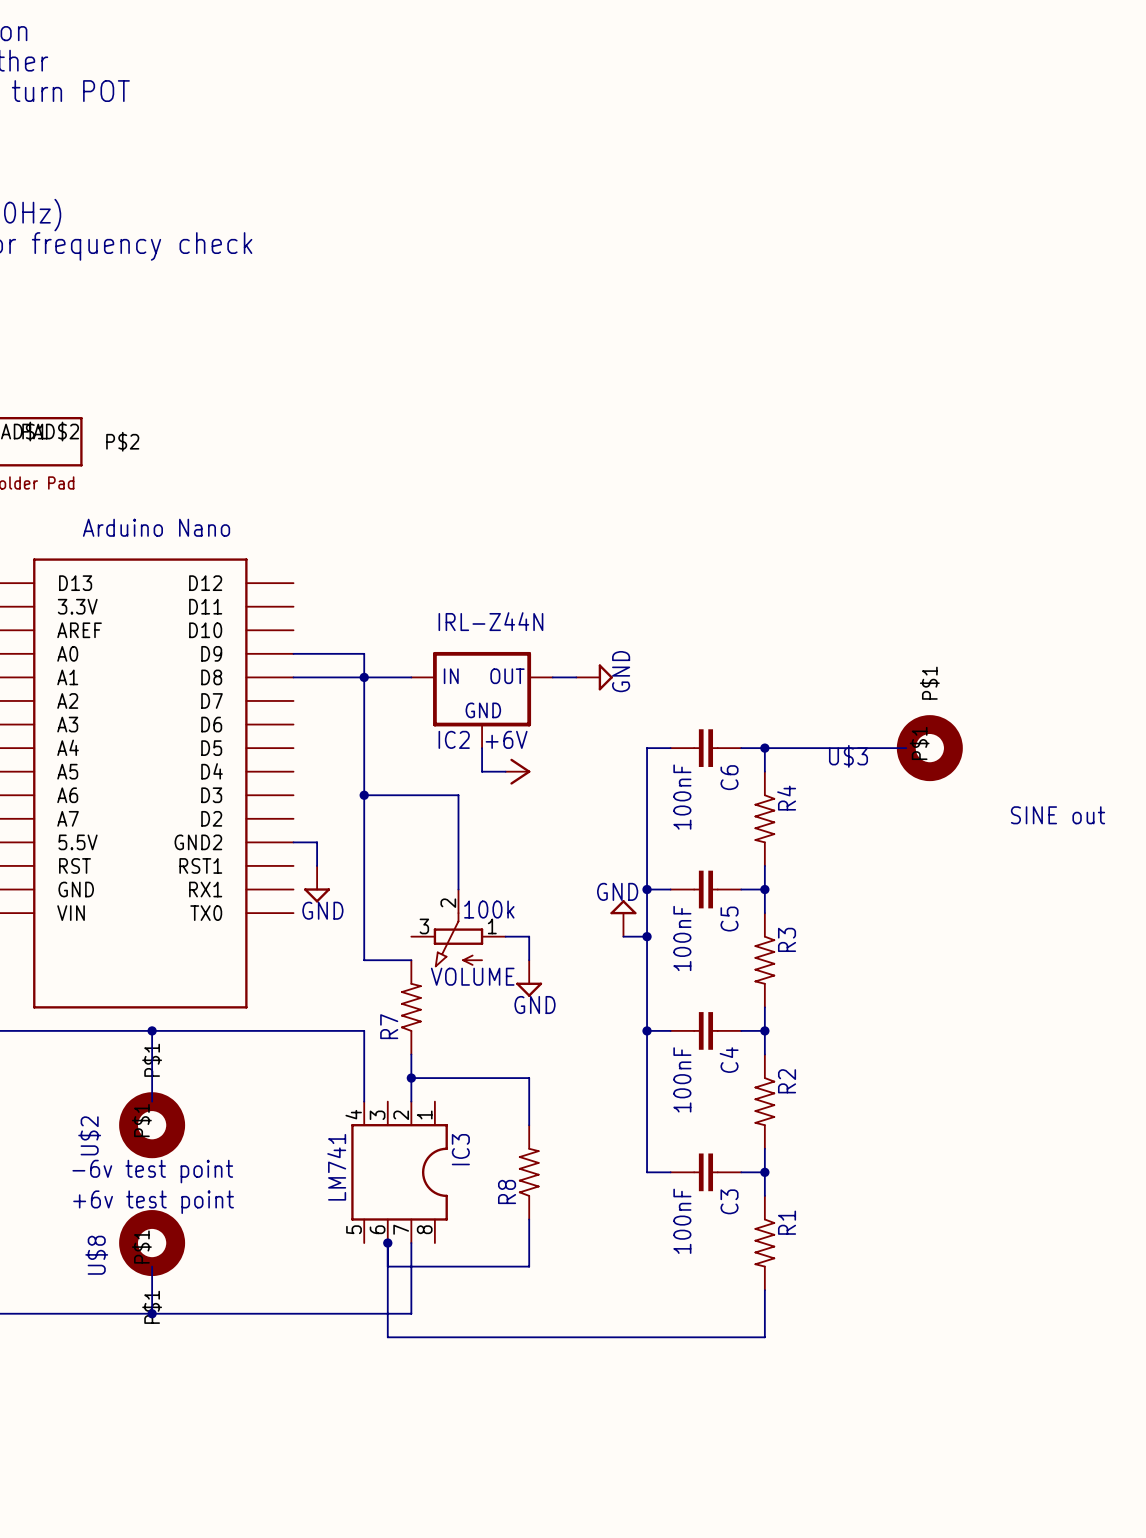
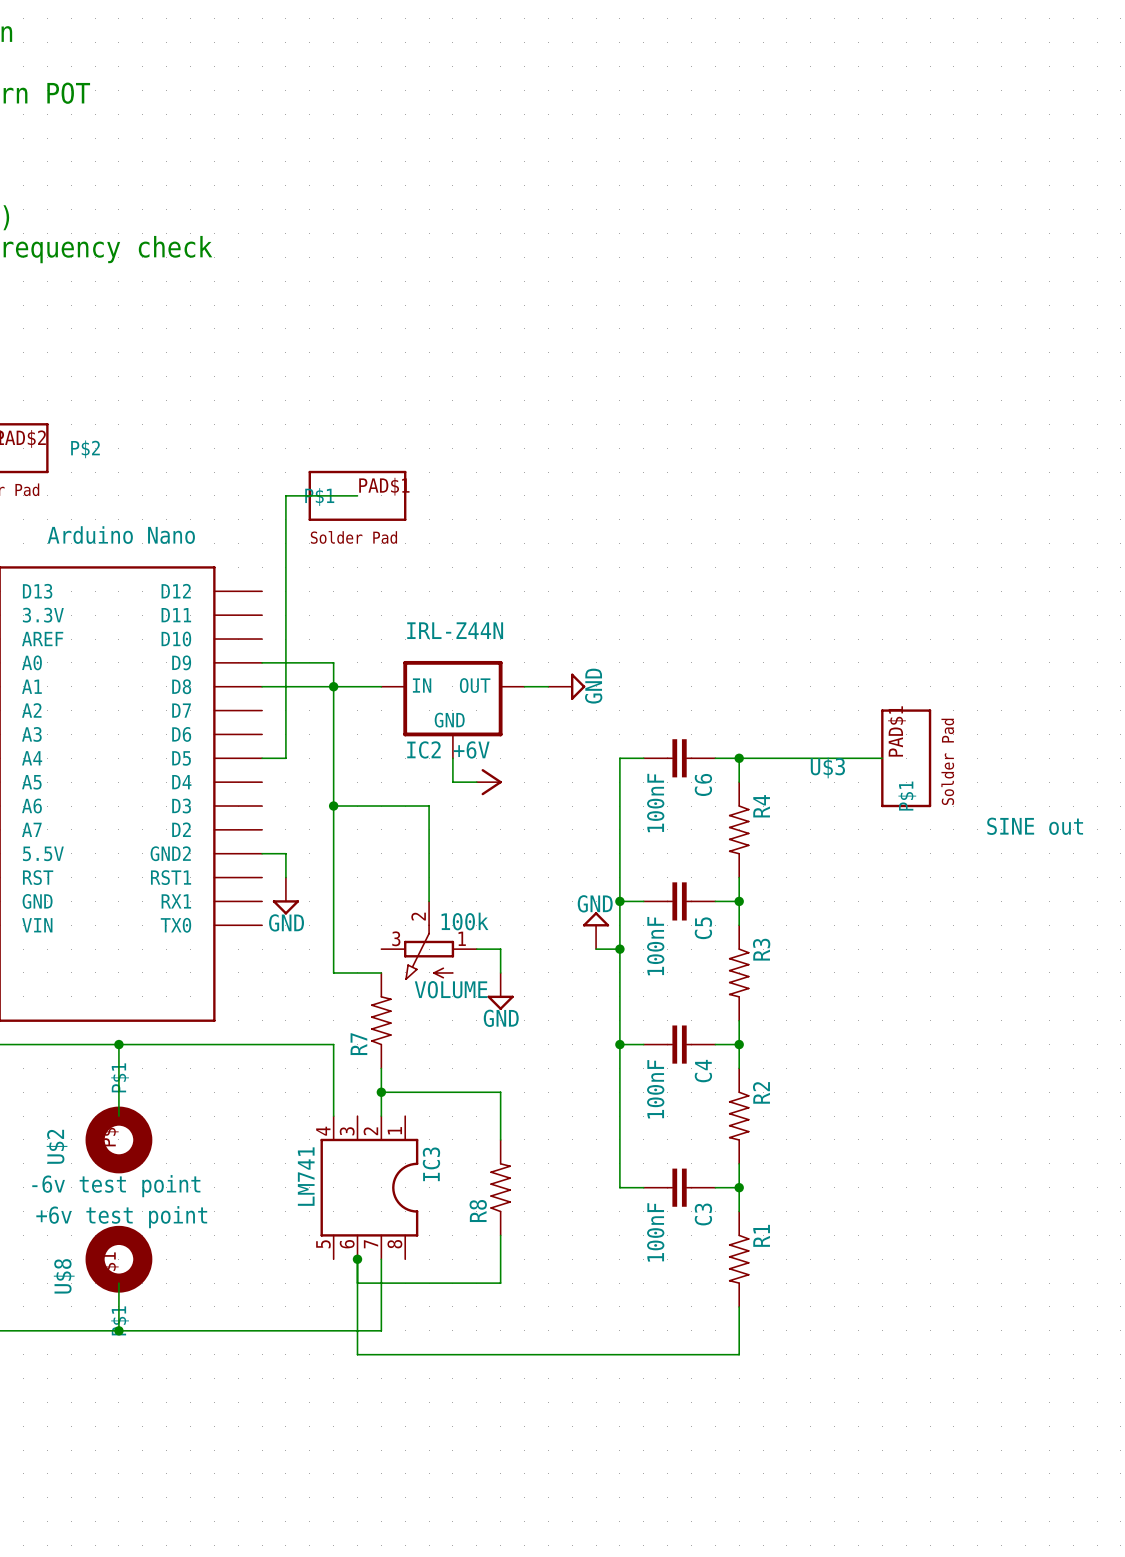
wire: none -> (357, 495) (285, 495) (285, 758) (262, 758)
part: none -> (357, 495)
U$3 symbol: [896, 715, 963, 782] -> [881, 709, 932, 808]

